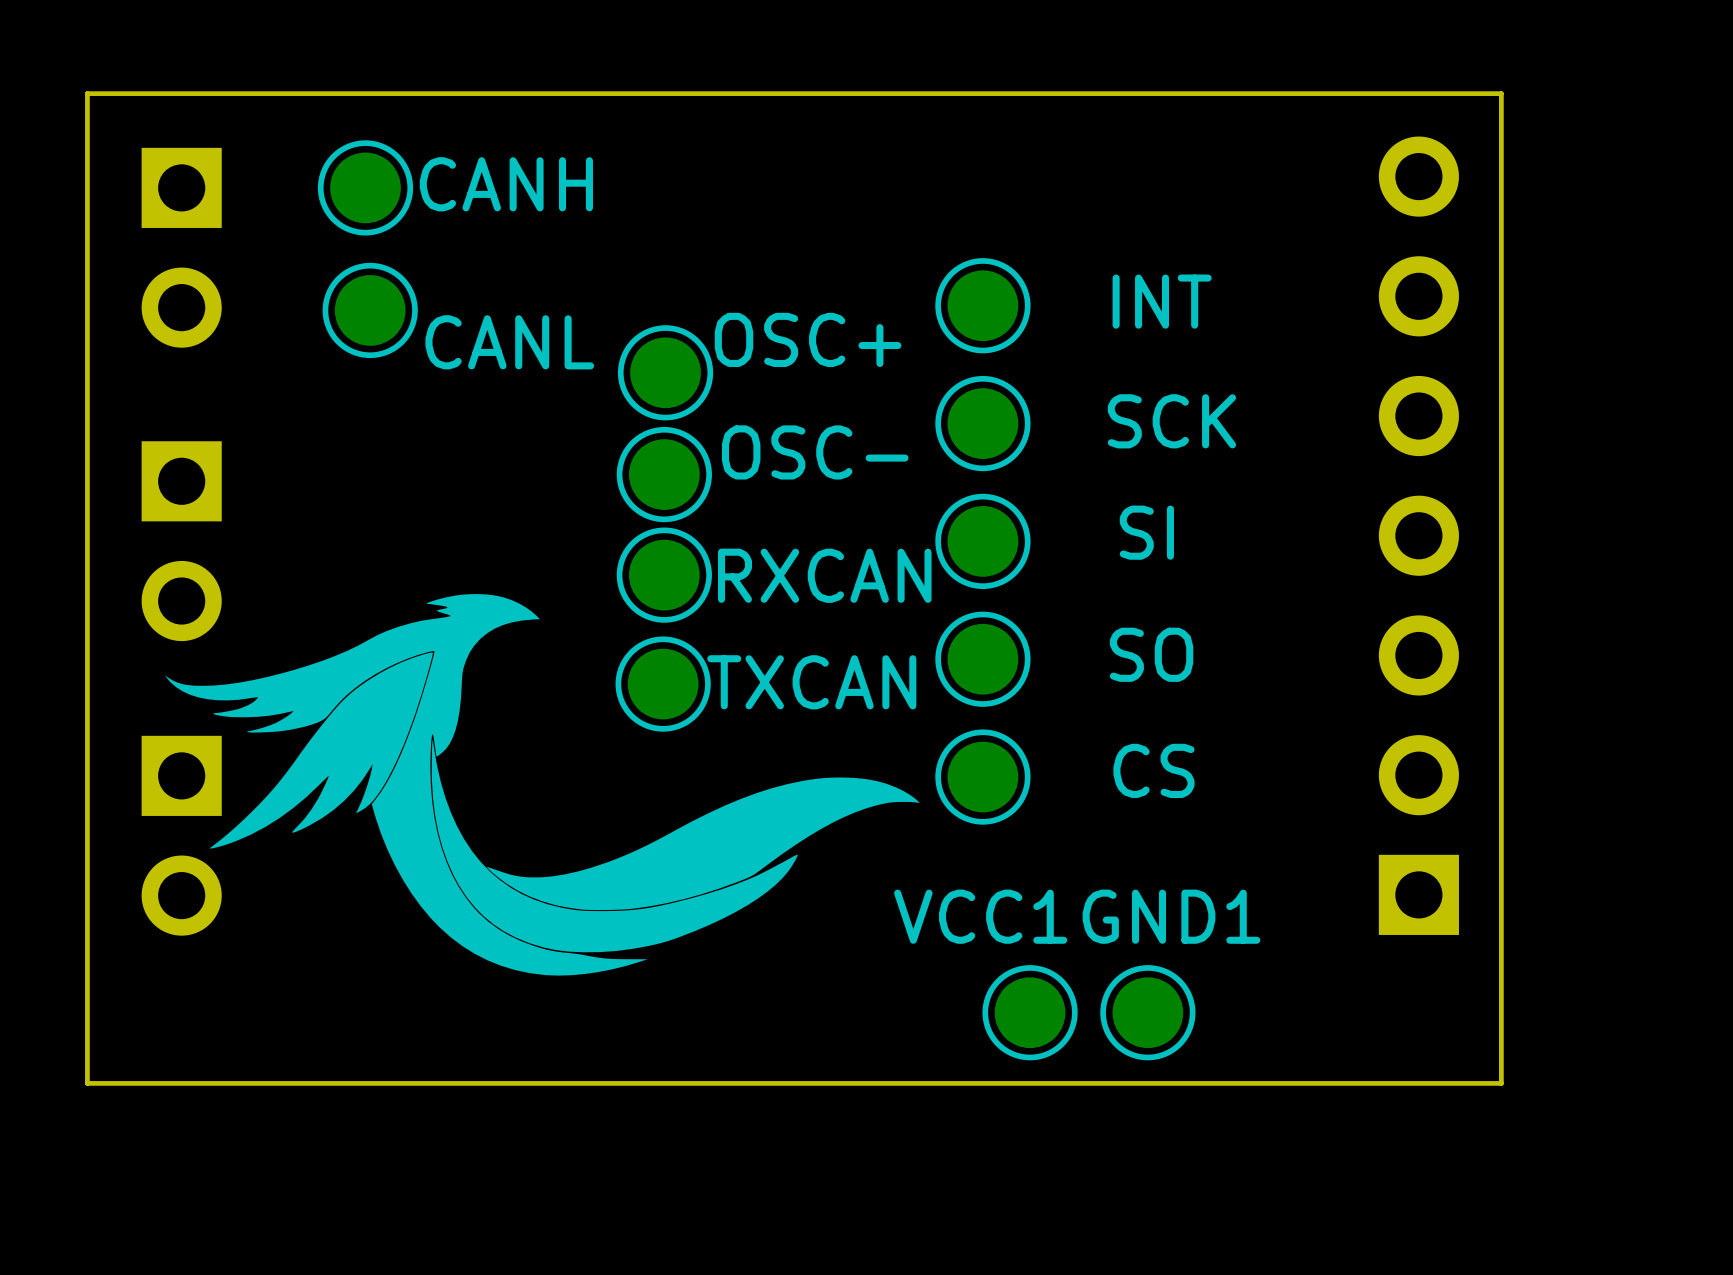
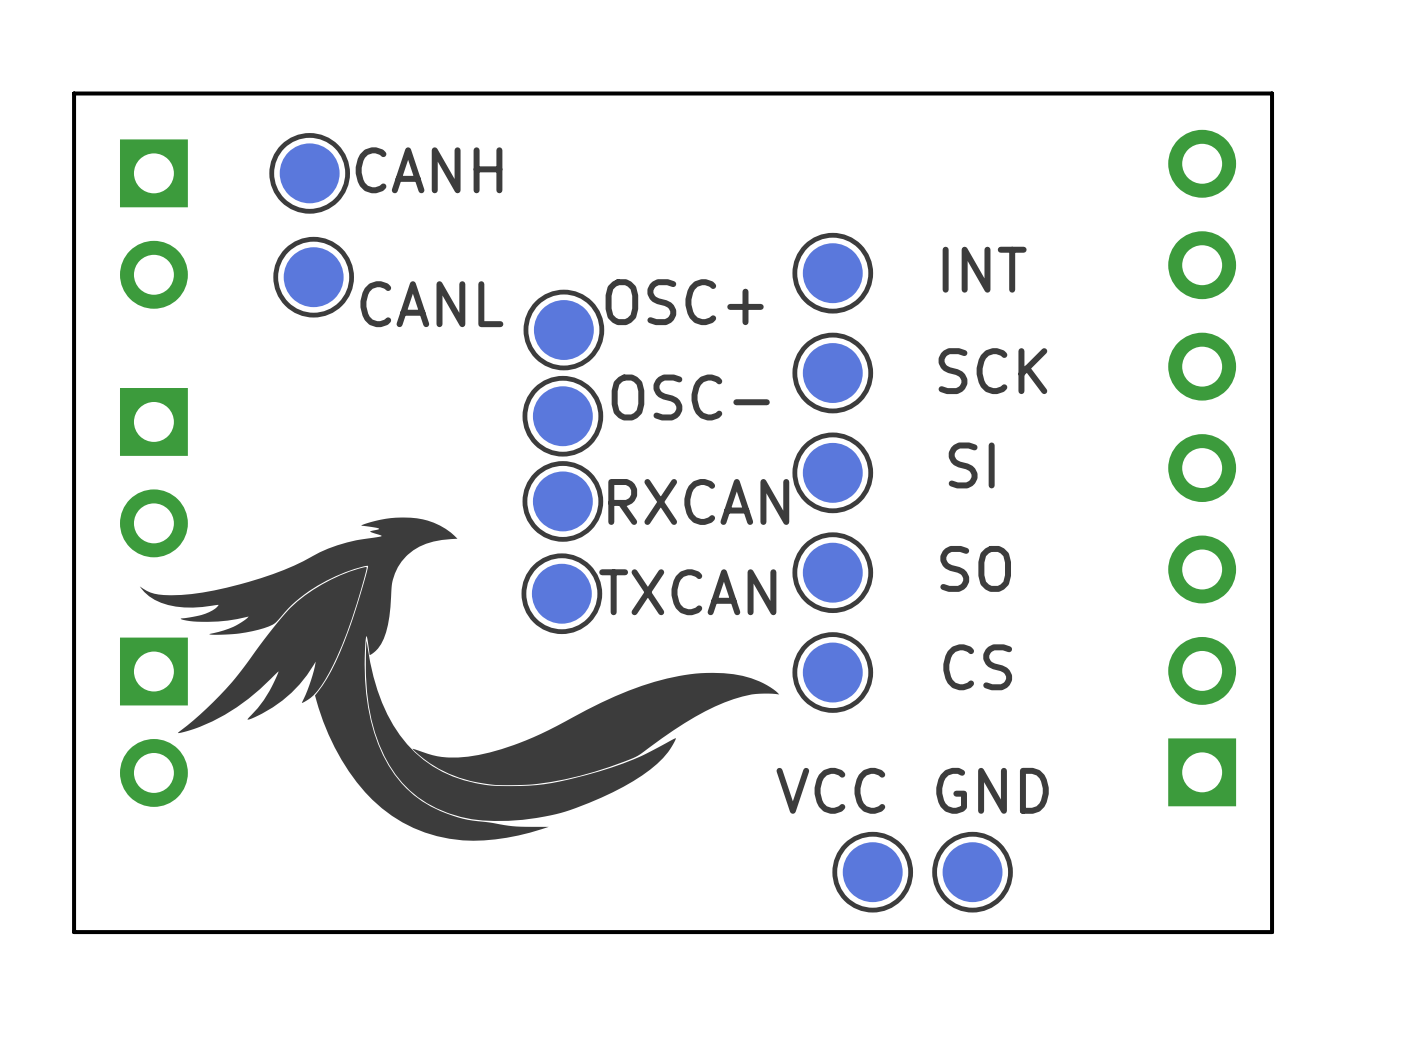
VCC1 name: VCC1 (980, 916) -> VCC (830, 790)
GND1 name: GND1 (1171, 916) -> GND (992, 790)

